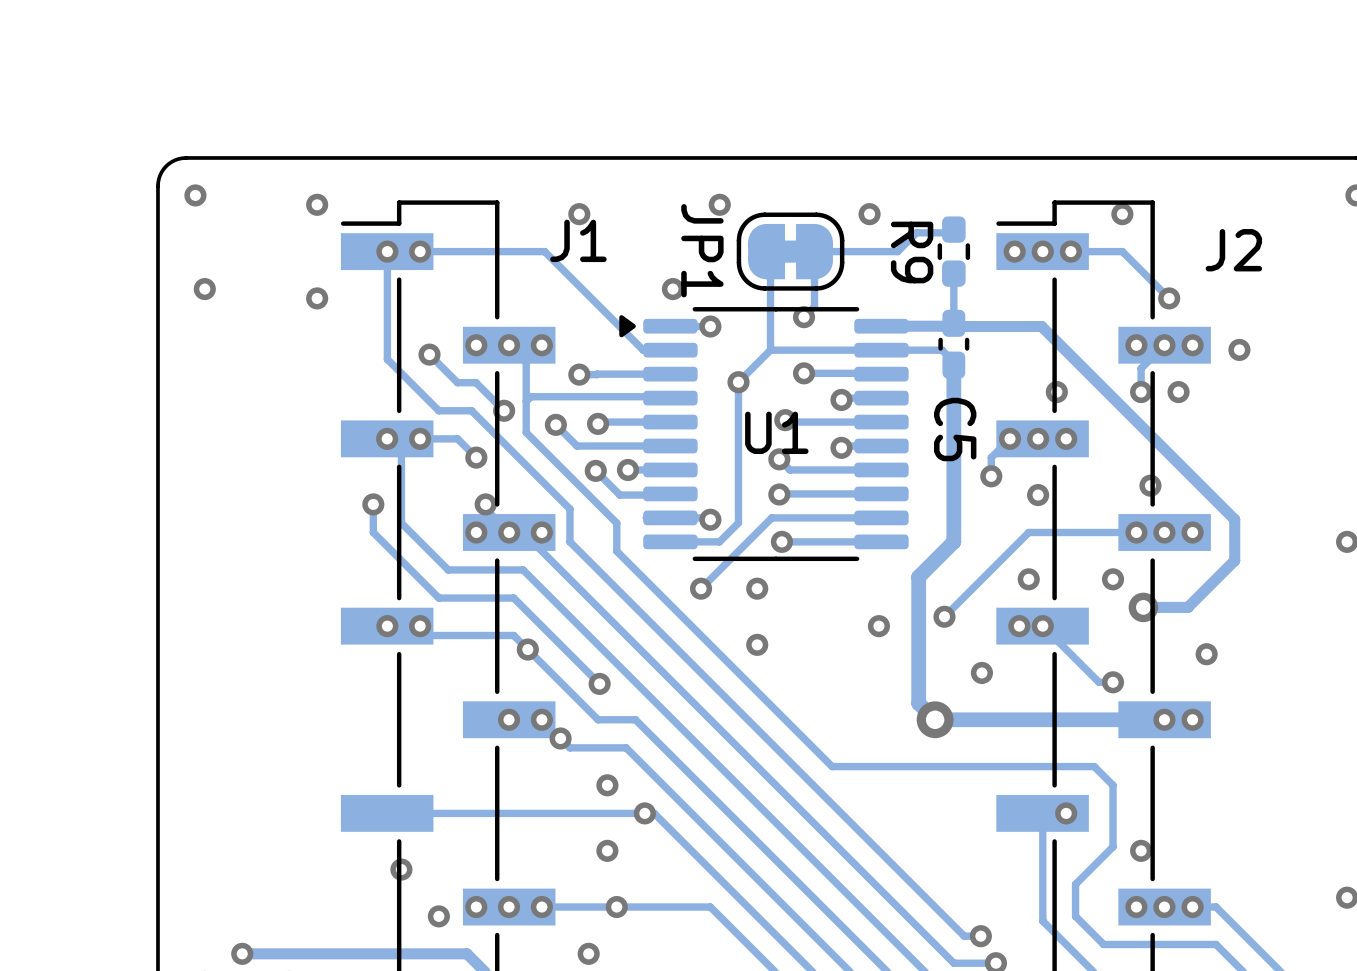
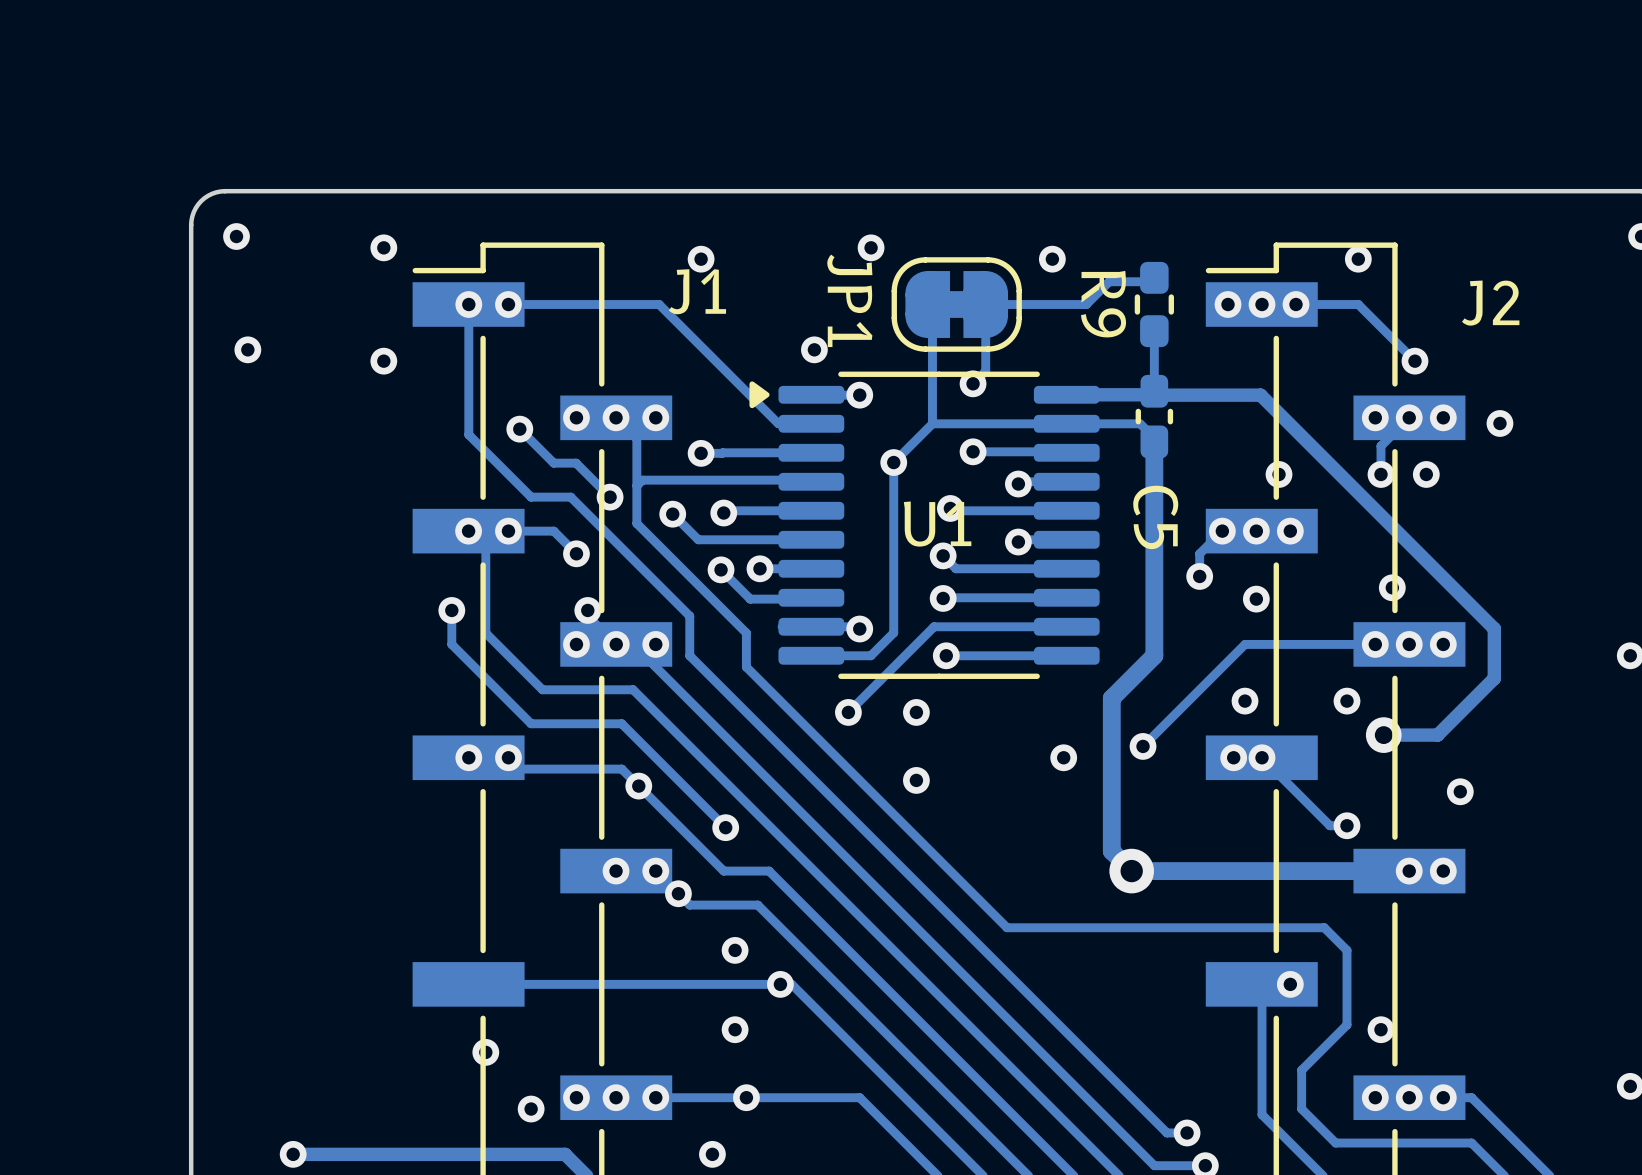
via: (981, 672) -> none

